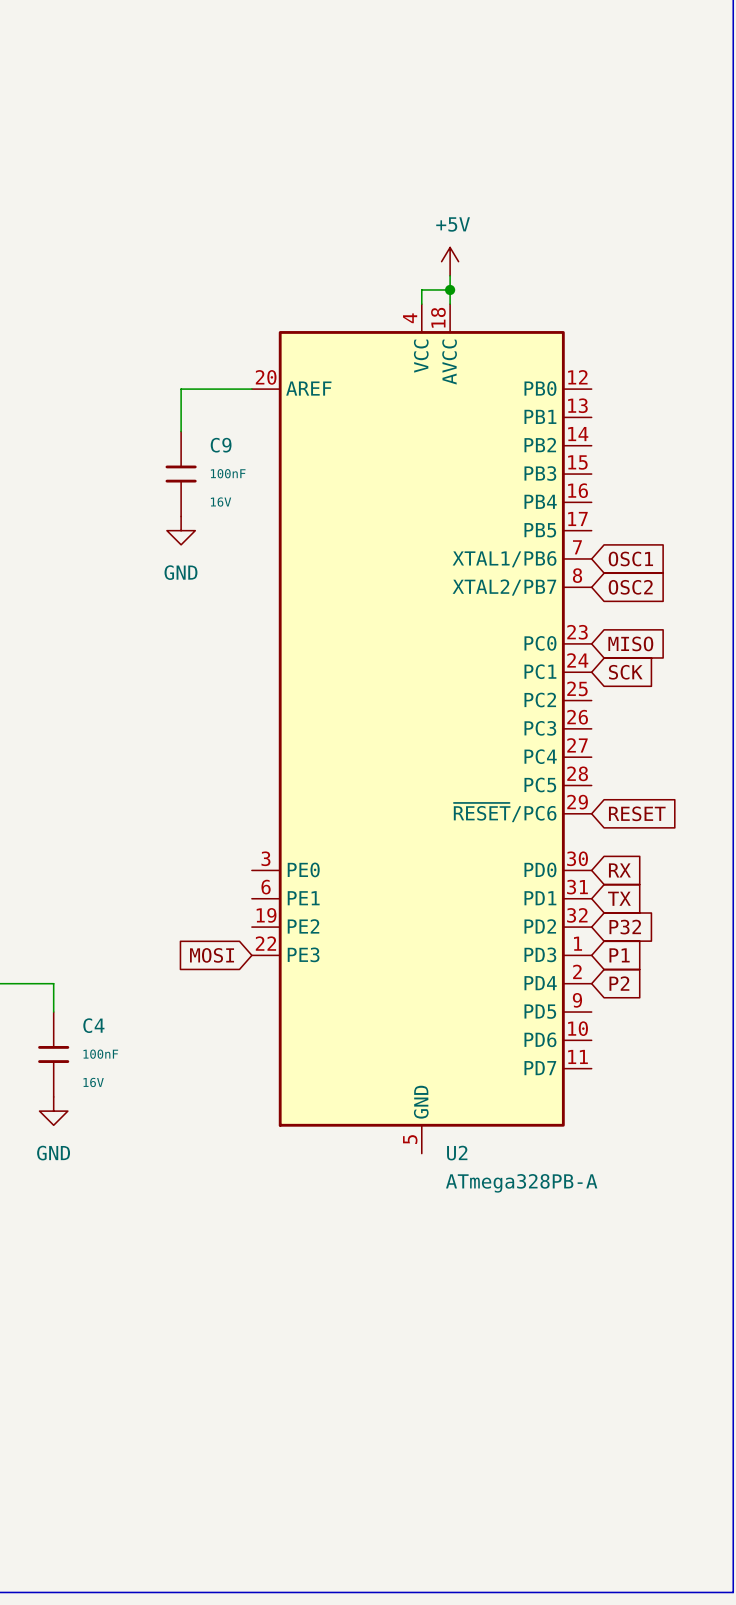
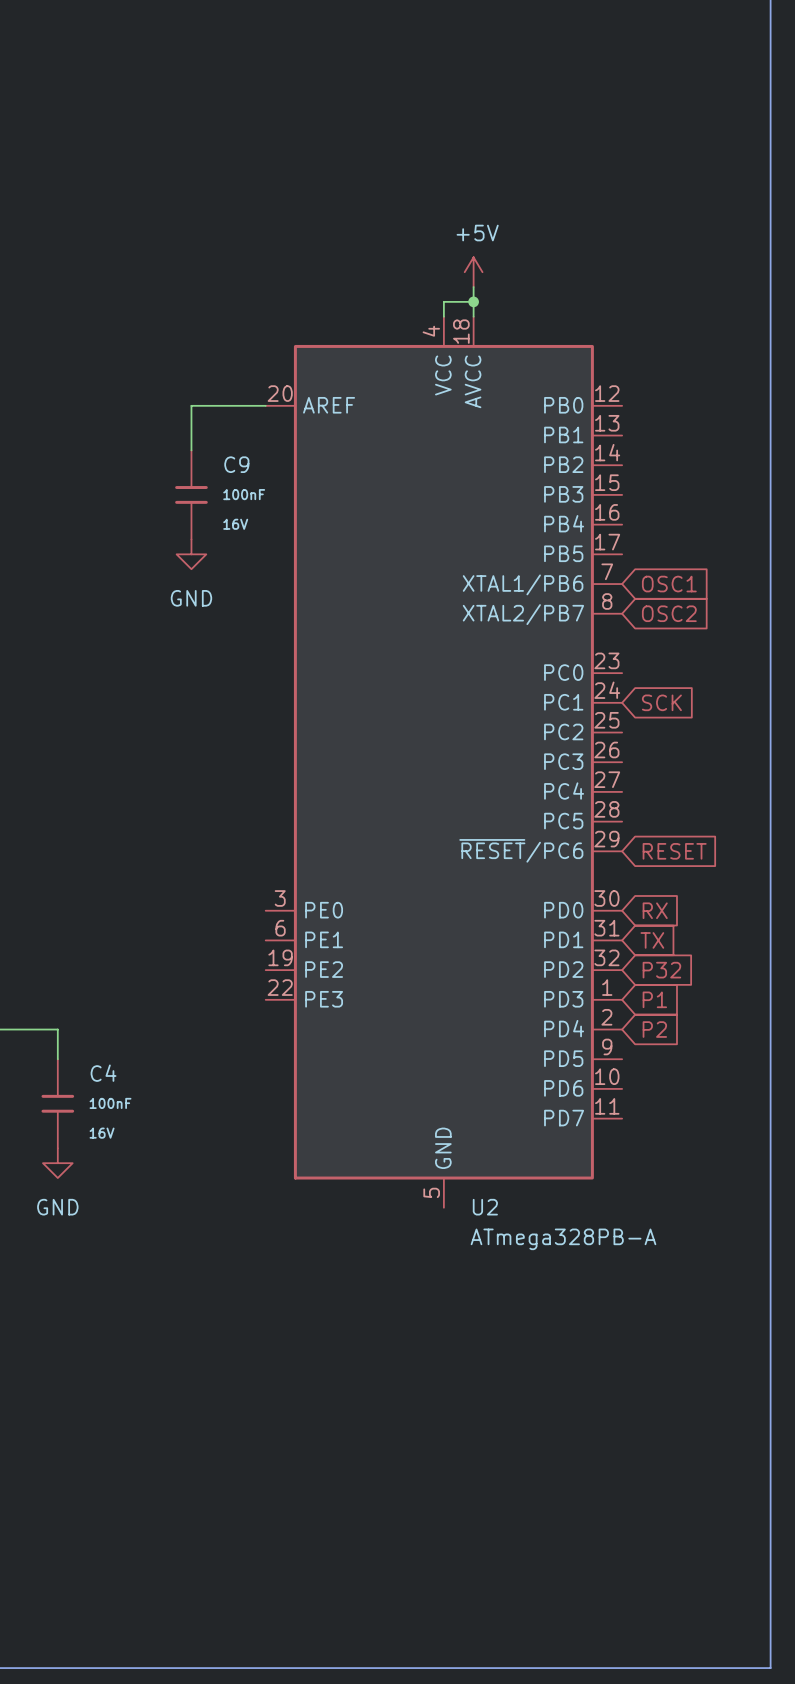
global label: MISO (630, 643) -> none
global label: MOSI (212, 955) -> none

